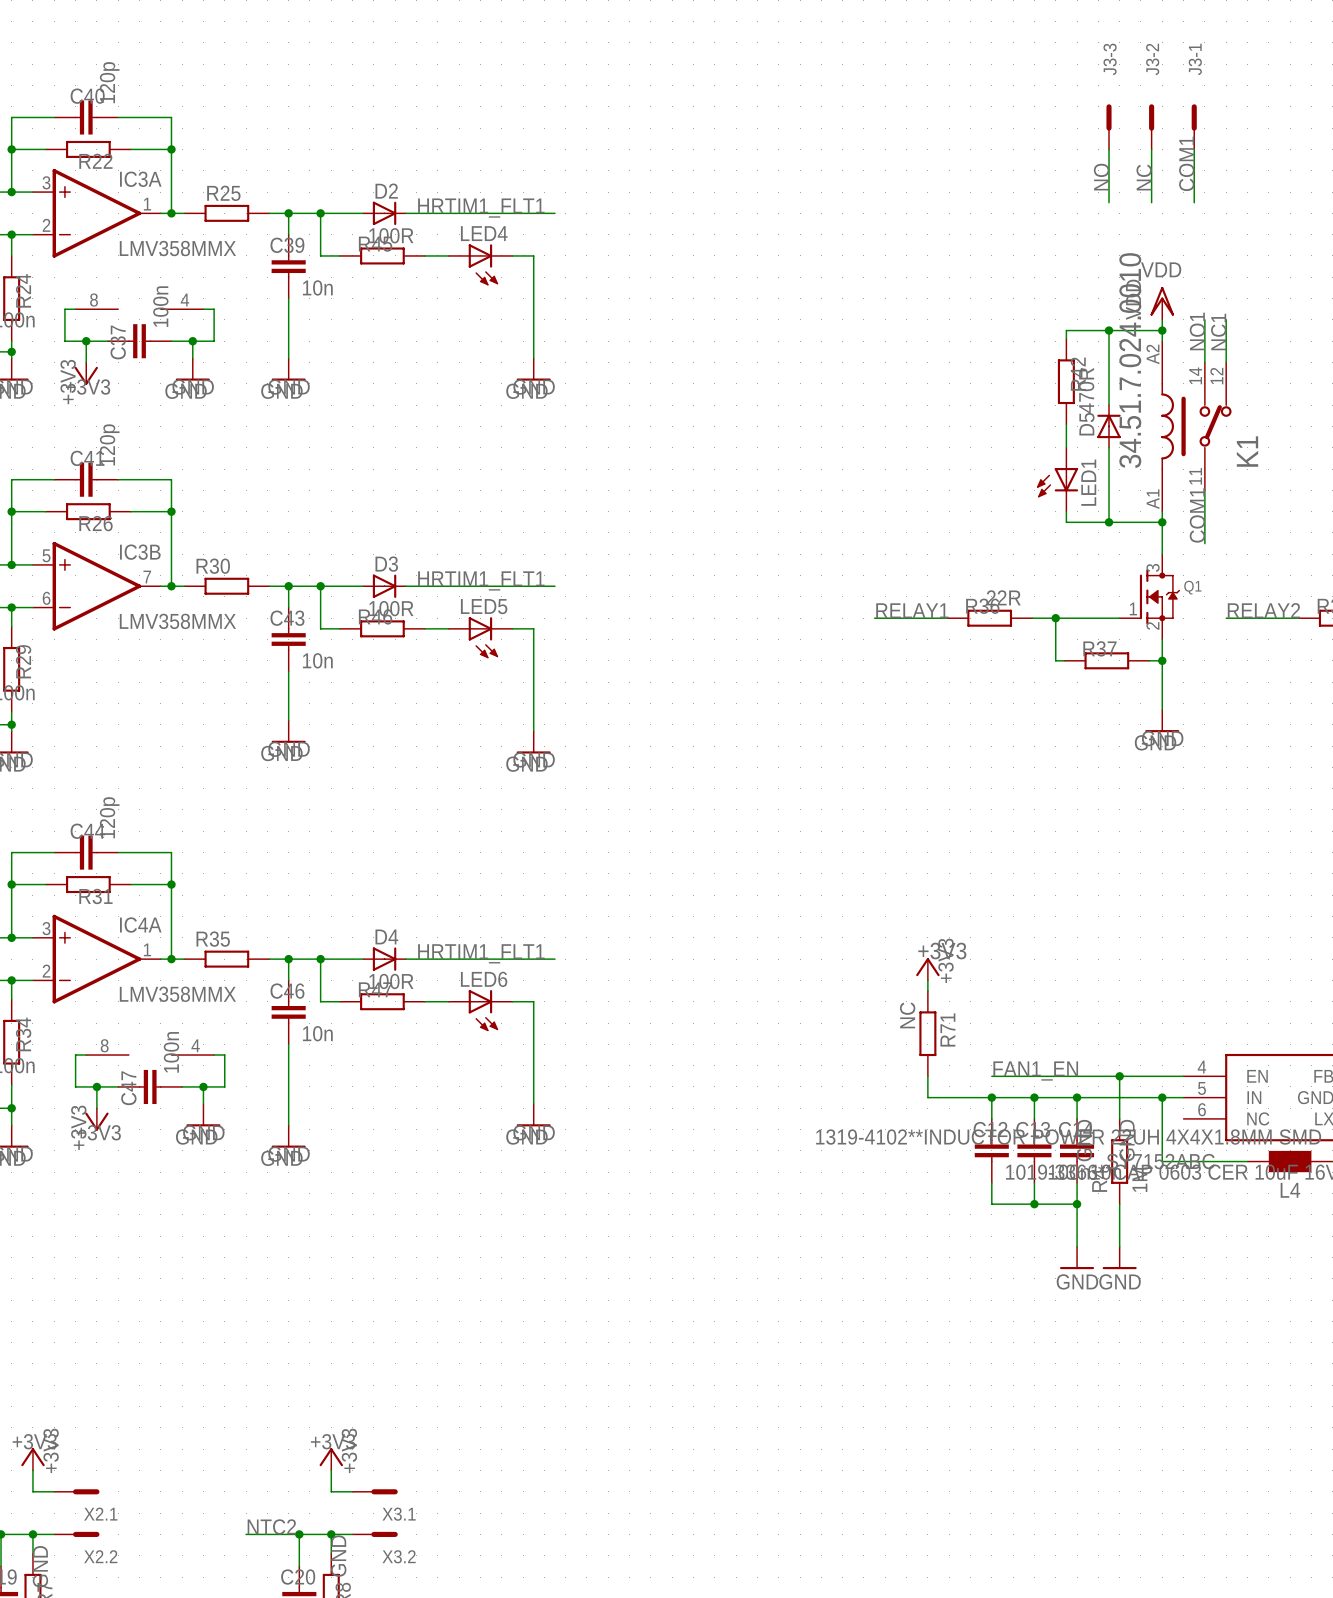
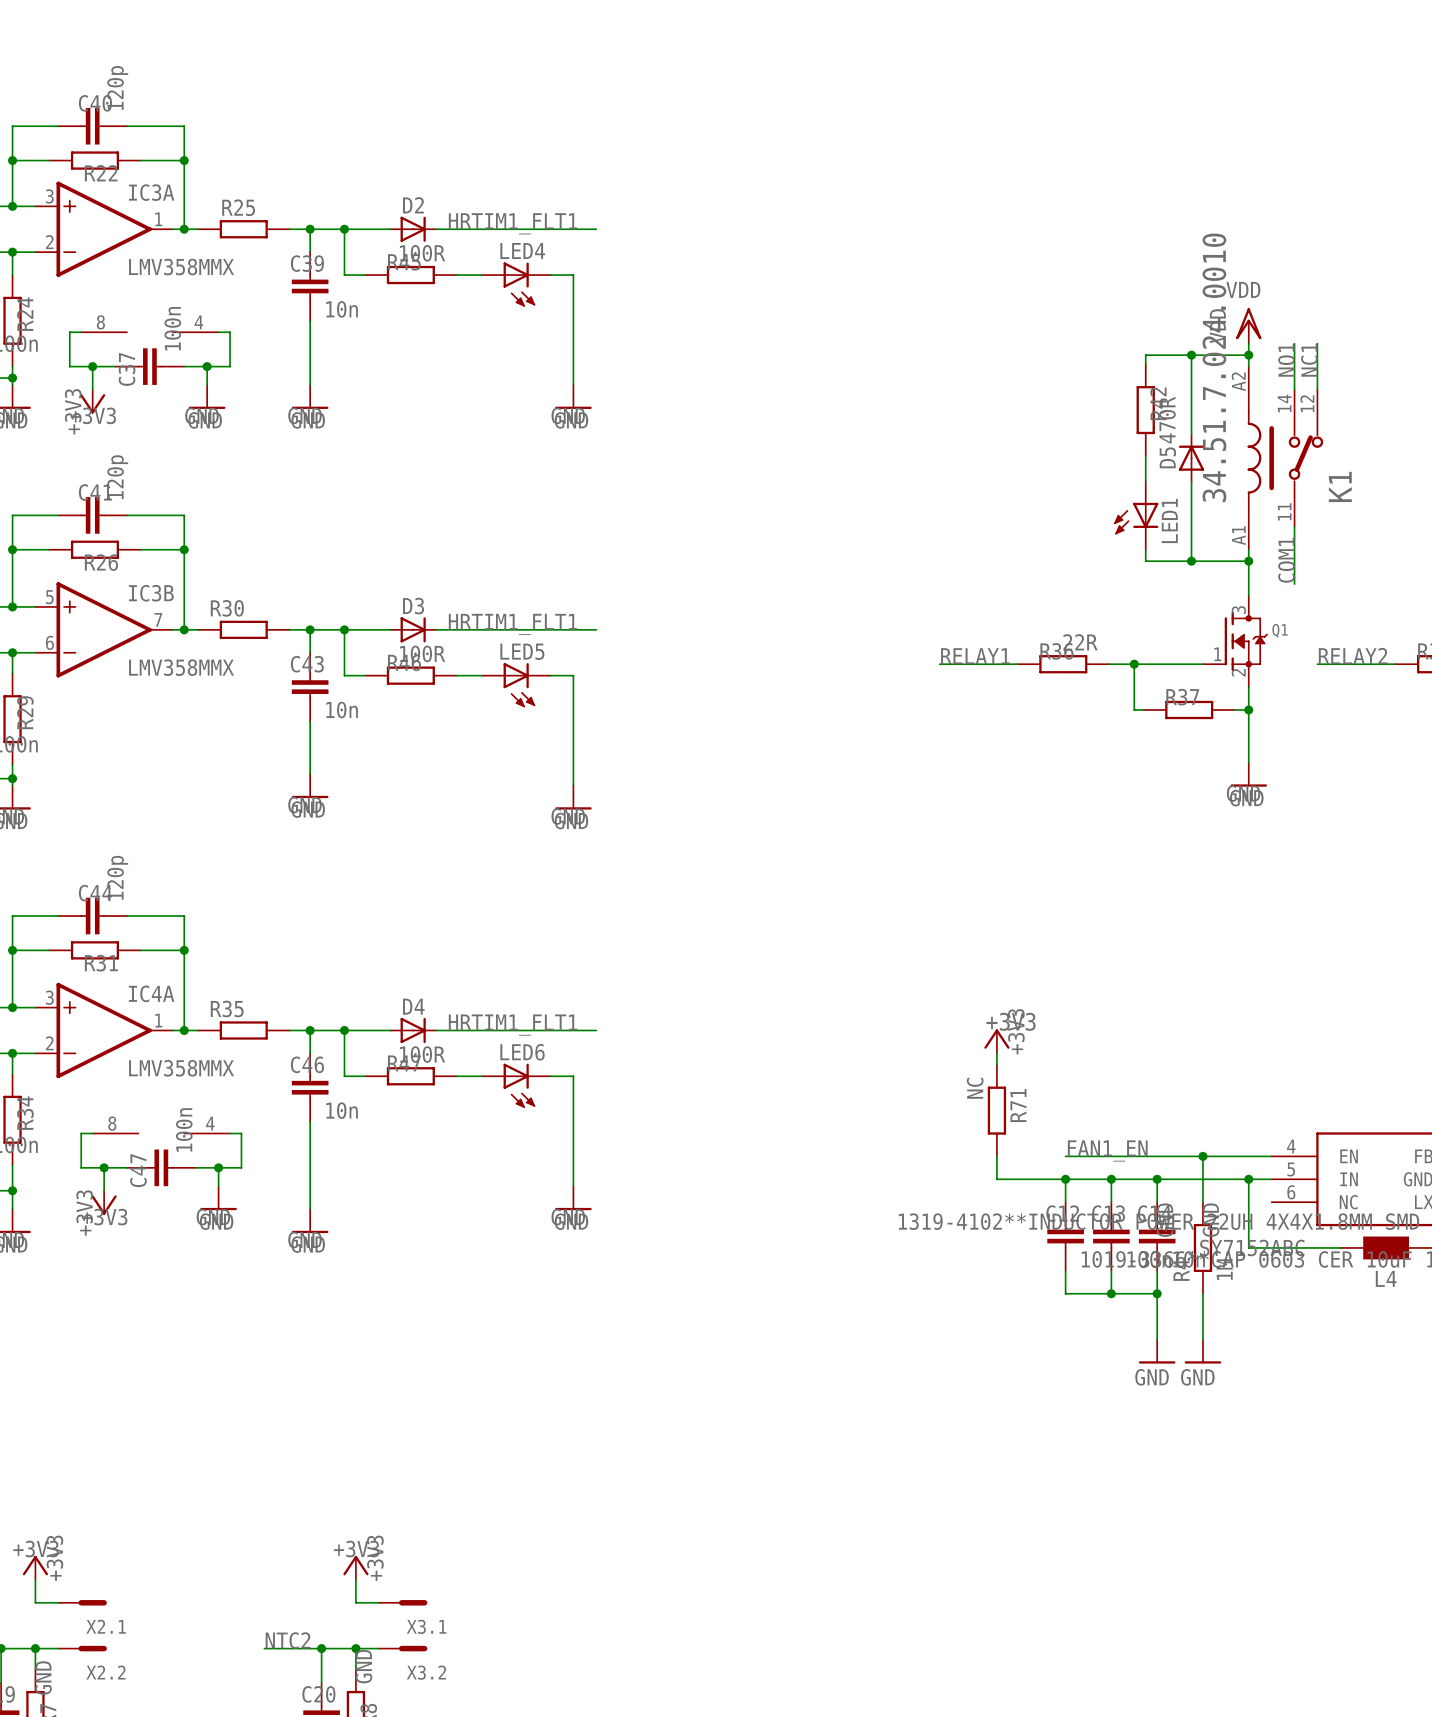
J3-3: (1109, 126) -> none
J3-2: (1151, 126) -> none
J3-1: (1194, 126) -> none
wire: (1109, 149) (1109, 202) -> none
wire: (1151, 149) (1151, 202) -> none
wire: (1194, 149) (1194, 202) -> none
label: COM1 (1186, 163) -> none
label: NO (1101, 177) -> none
label: NC (1144, 177) -> none

